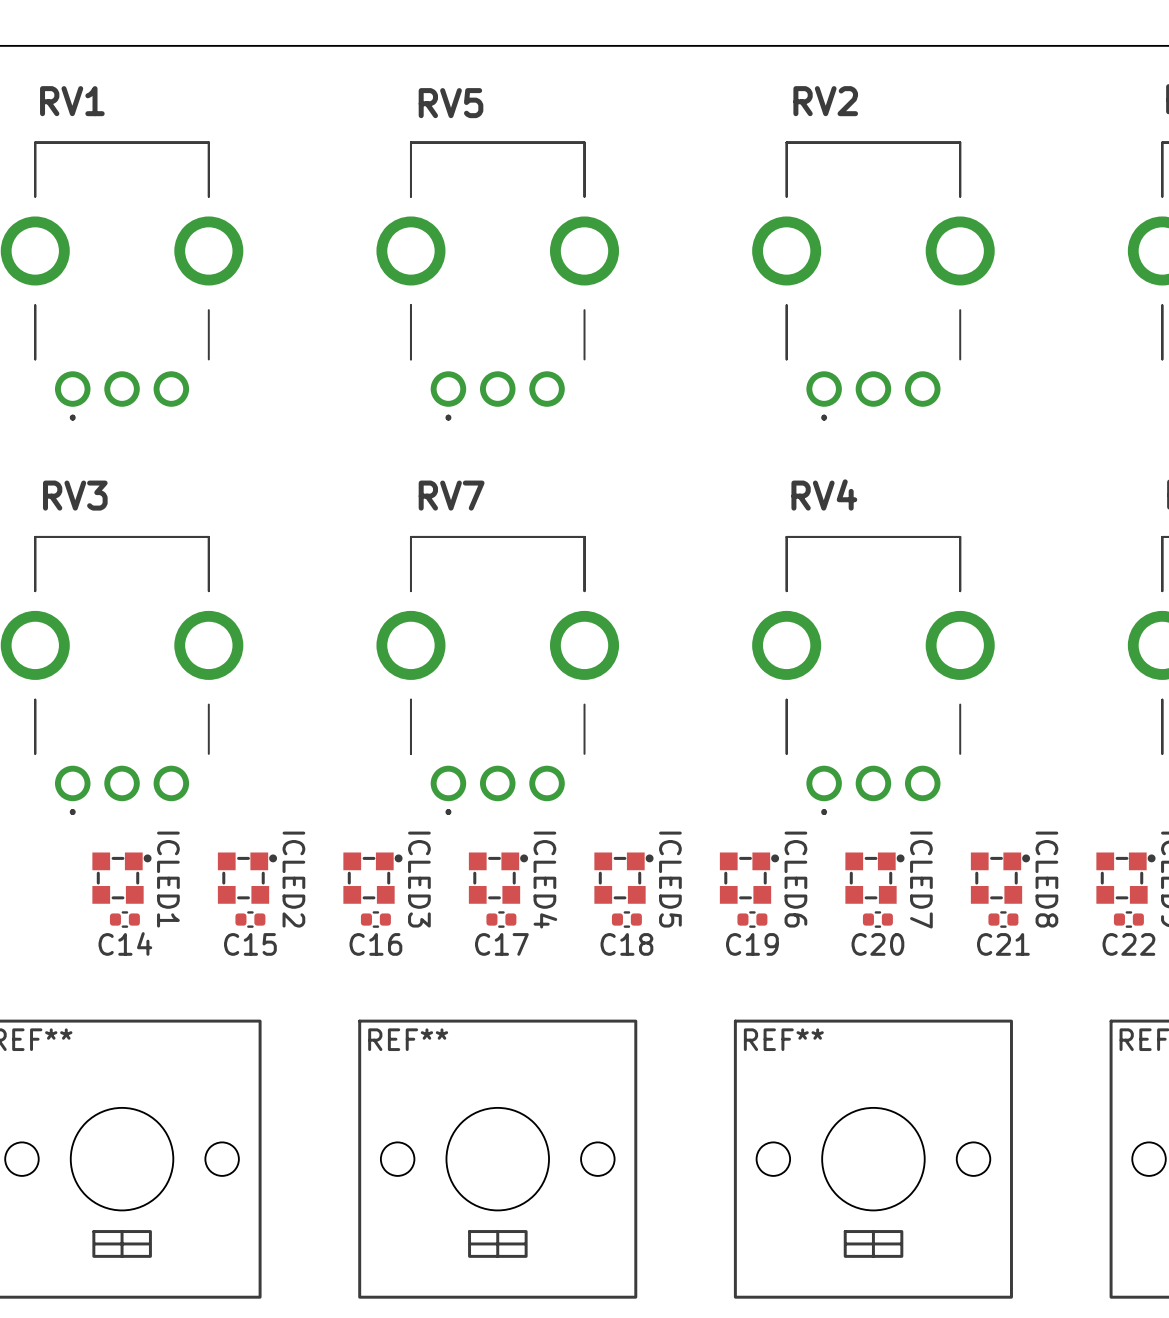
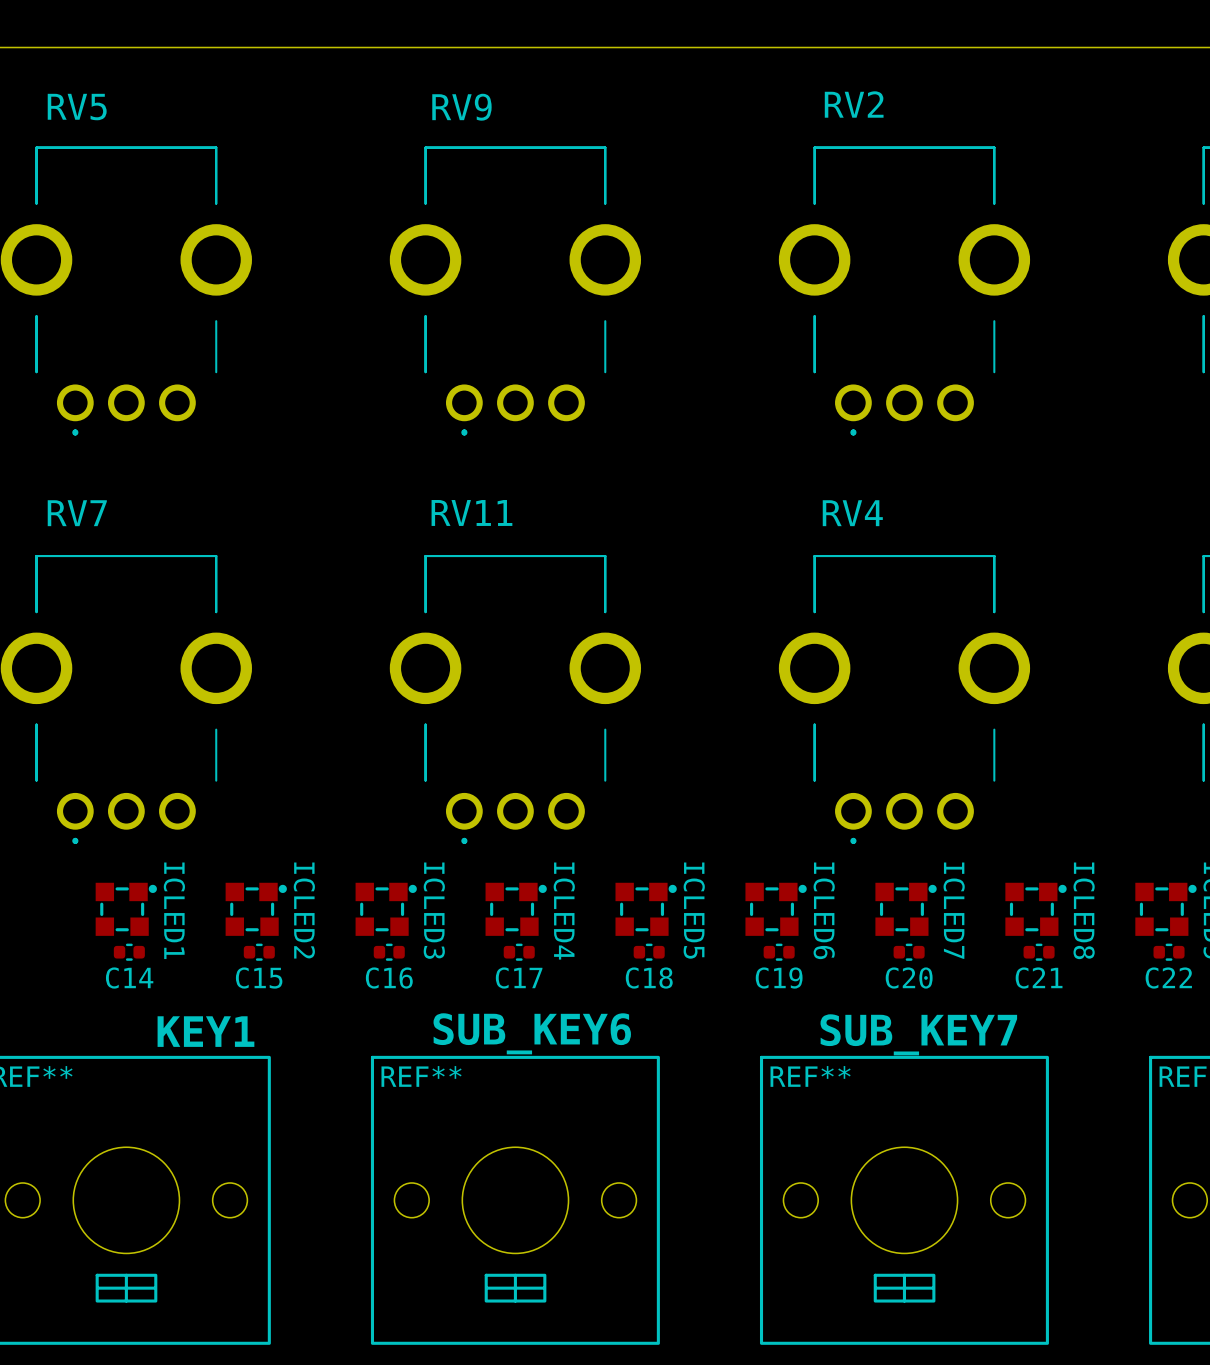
RV1 name: RV1 (72, 101) -> RV5 (77, 107)
RV5 name: RV5 (451, 103) -> RV9 (461, 107)
RV3 name: RV3 (75, 495) -> RV7 (77, 513)
RV7 name: RV7 (451, 495) -> RV11 (471, 512)
text: none -> SUB_KEY6 (532, 1033)
text: none -> KEY1 (205, 1031)
text: none -> SUB_KEY7 (918, 1034)

